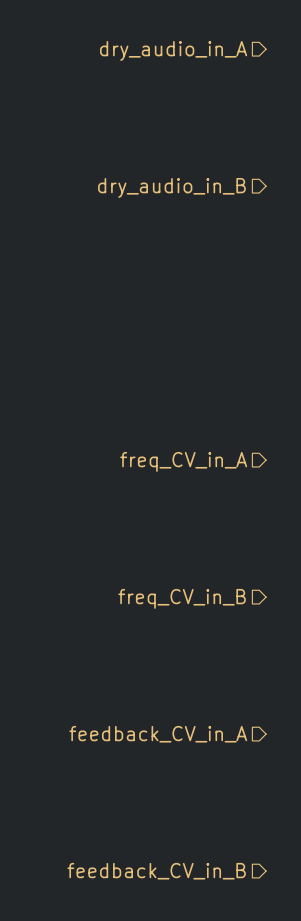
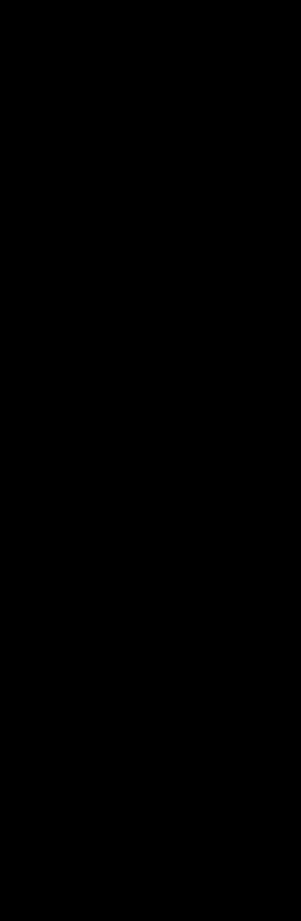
hierarchical label: dry_audio_in_A (173, 50) -> none
hierarchical label: dry_audio_in_B (171, 187) -> none
hierarchical label: freq_CV_in_A (183, 461) -> none
hierarchical label: freq_CV_in_B (182, 598) -> none
hierarchical label: feedback_CV_in_A (158, 734) -> none
hierarchical label: feedback_CV_in_B (156, 871) -> none

